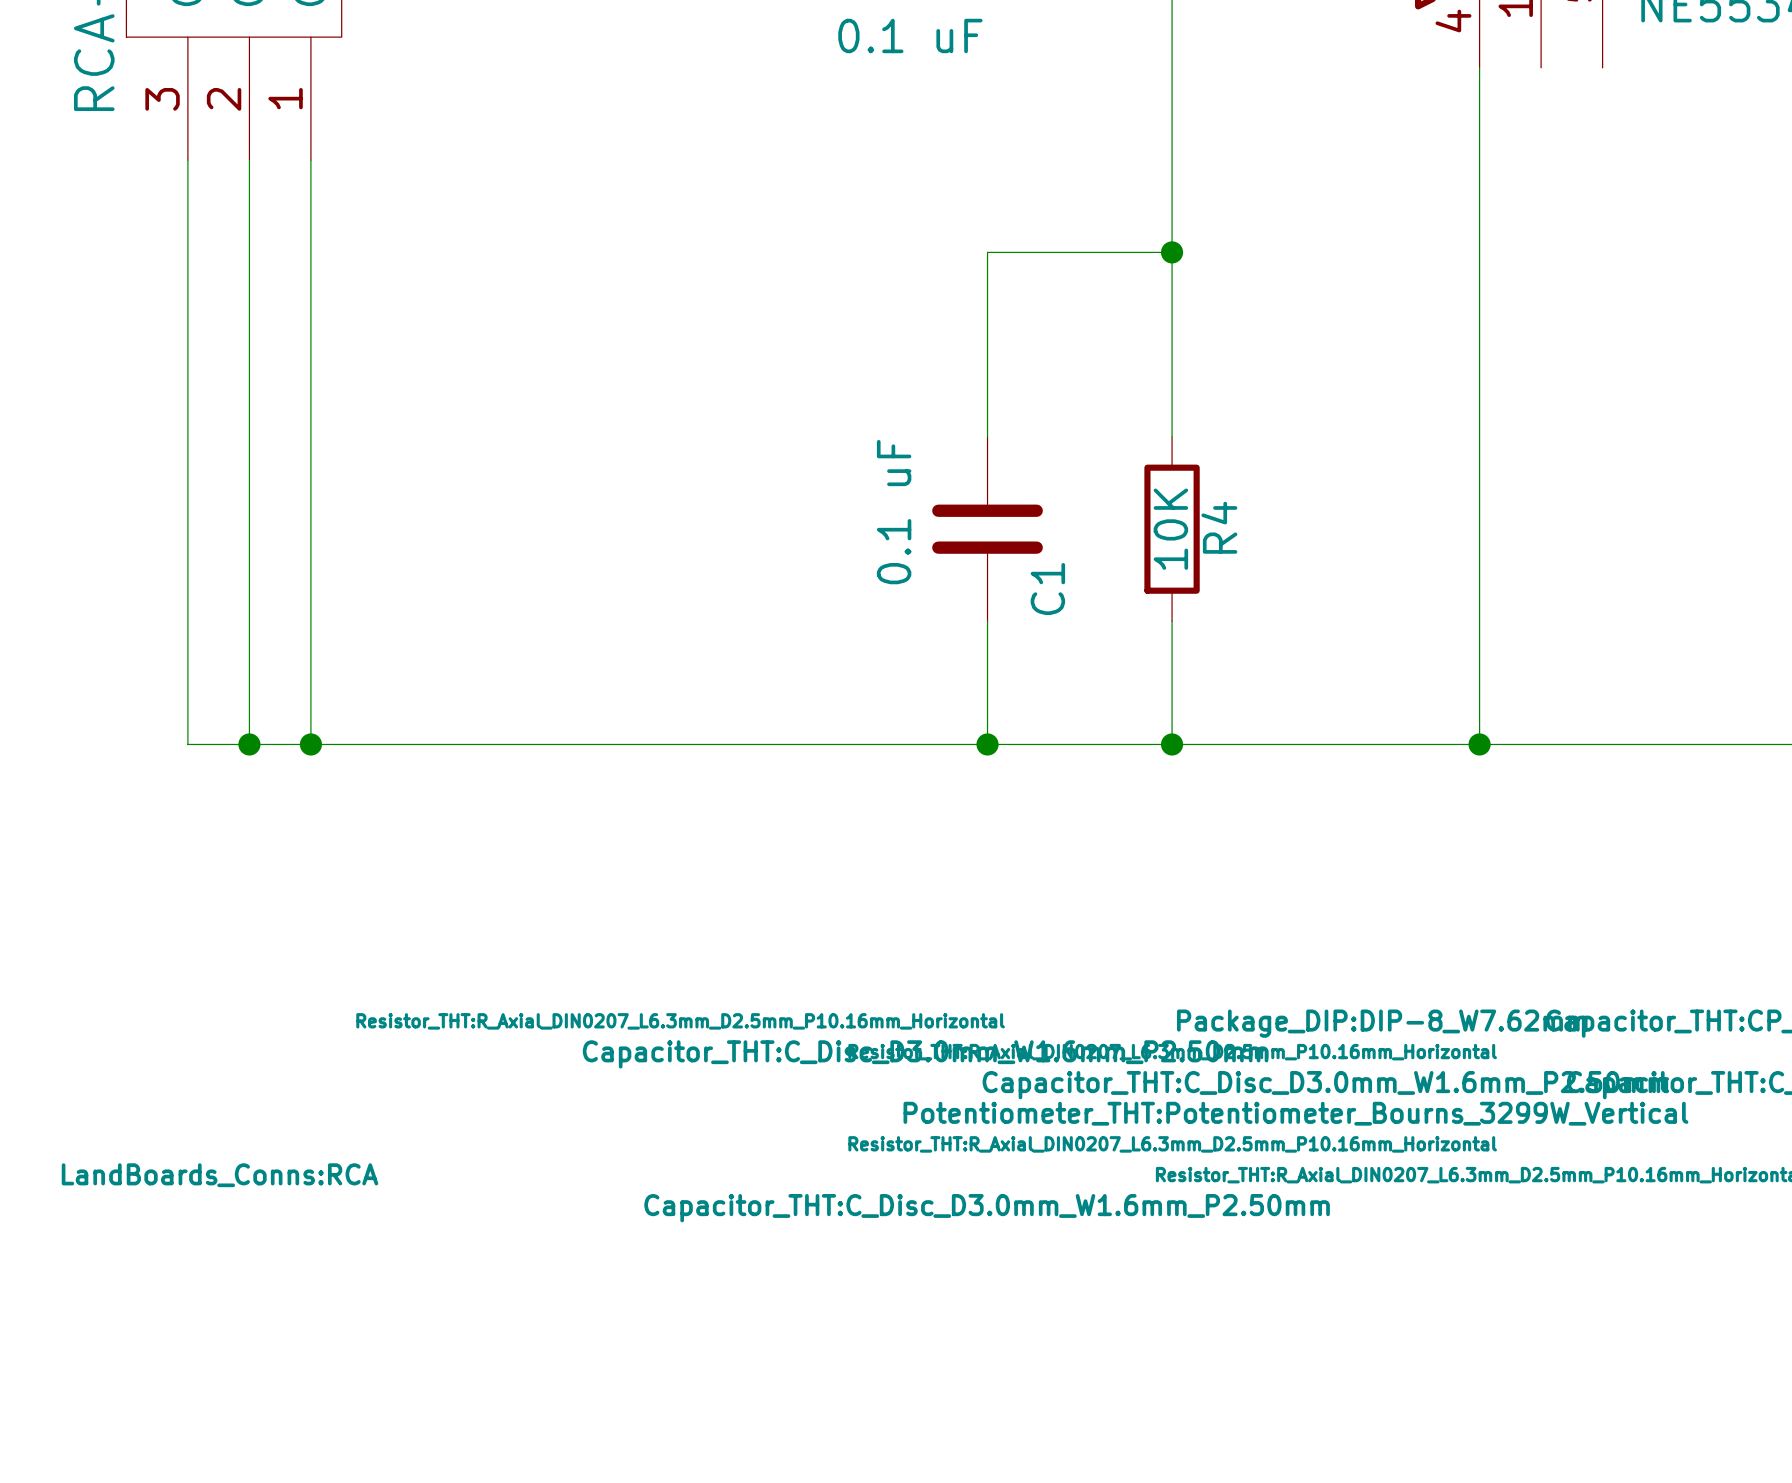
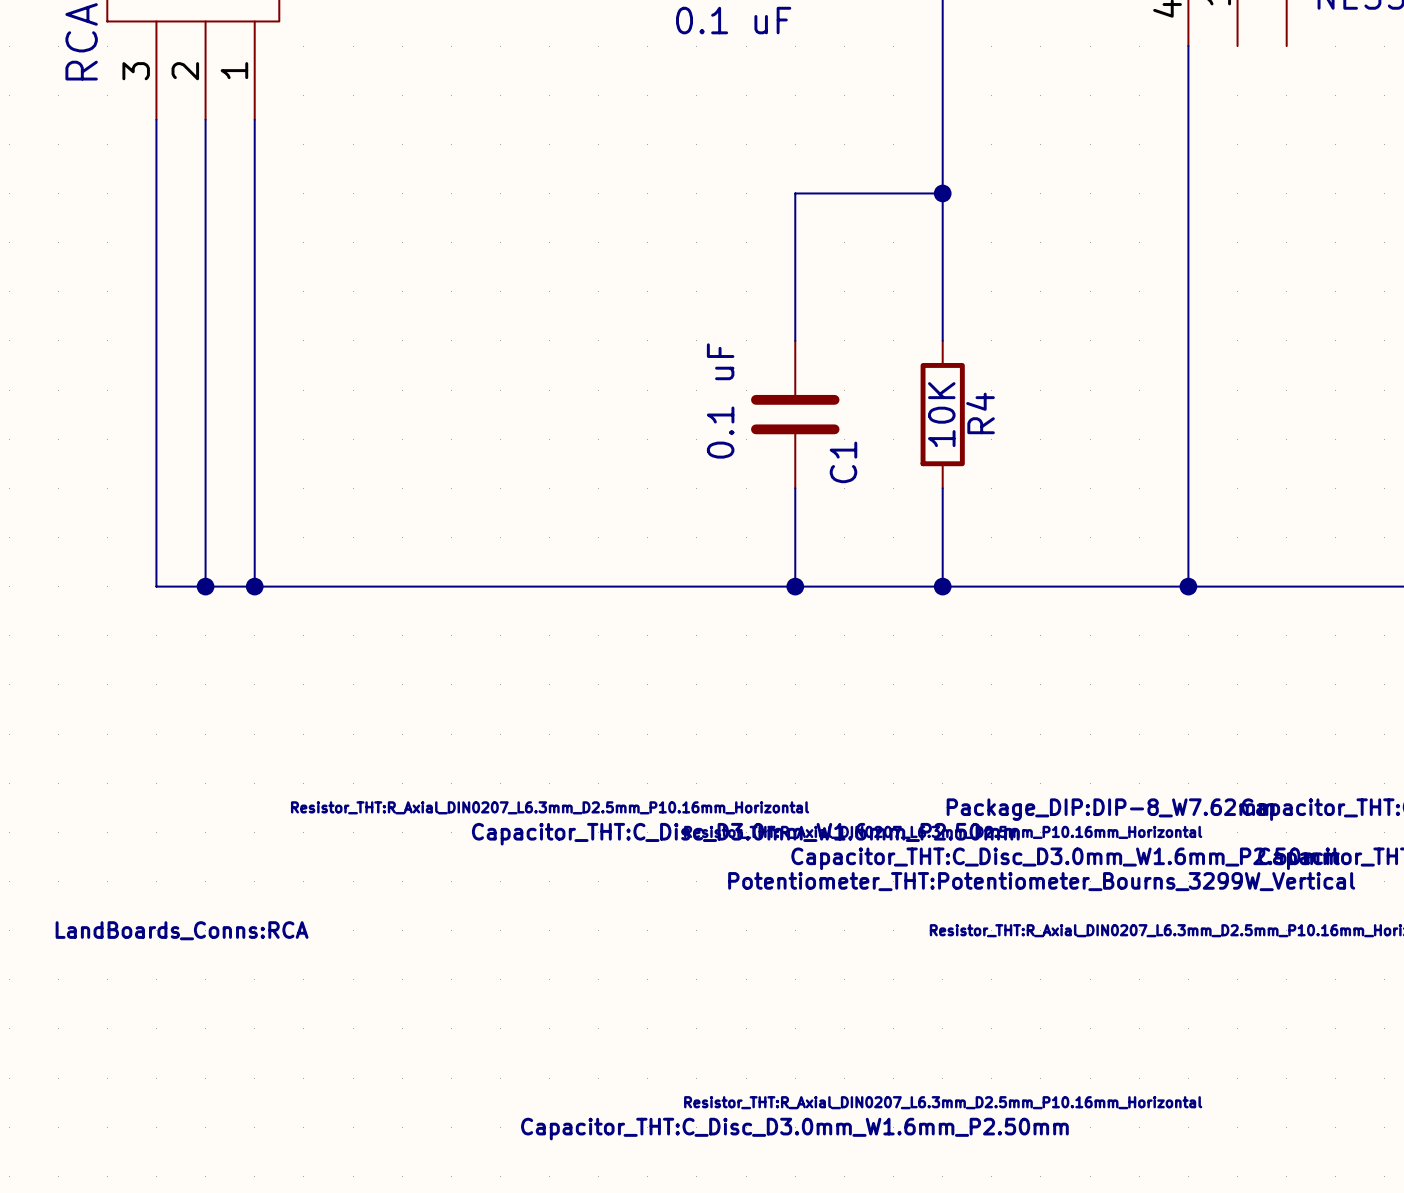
R4 text position: Resistor_THT:R_Axial_DIN0207_L6.3mm_D2.5mm_P10.16mm_Horizontal (1172, 1144) -> Resistor_THT:R_Axial_DIN0207_L6.3mm_D2.5mm_P10.16mm_Horizontal (943, 1102)
C1 text position: Capacitor_THT:C_Disc_D3.0mm_W1.6mm_P2.50mm (987, 1208) -> Capacitor_THT:C_Disc_D3.0mm_W1.6mm_P2.50mm (794, 1129)

